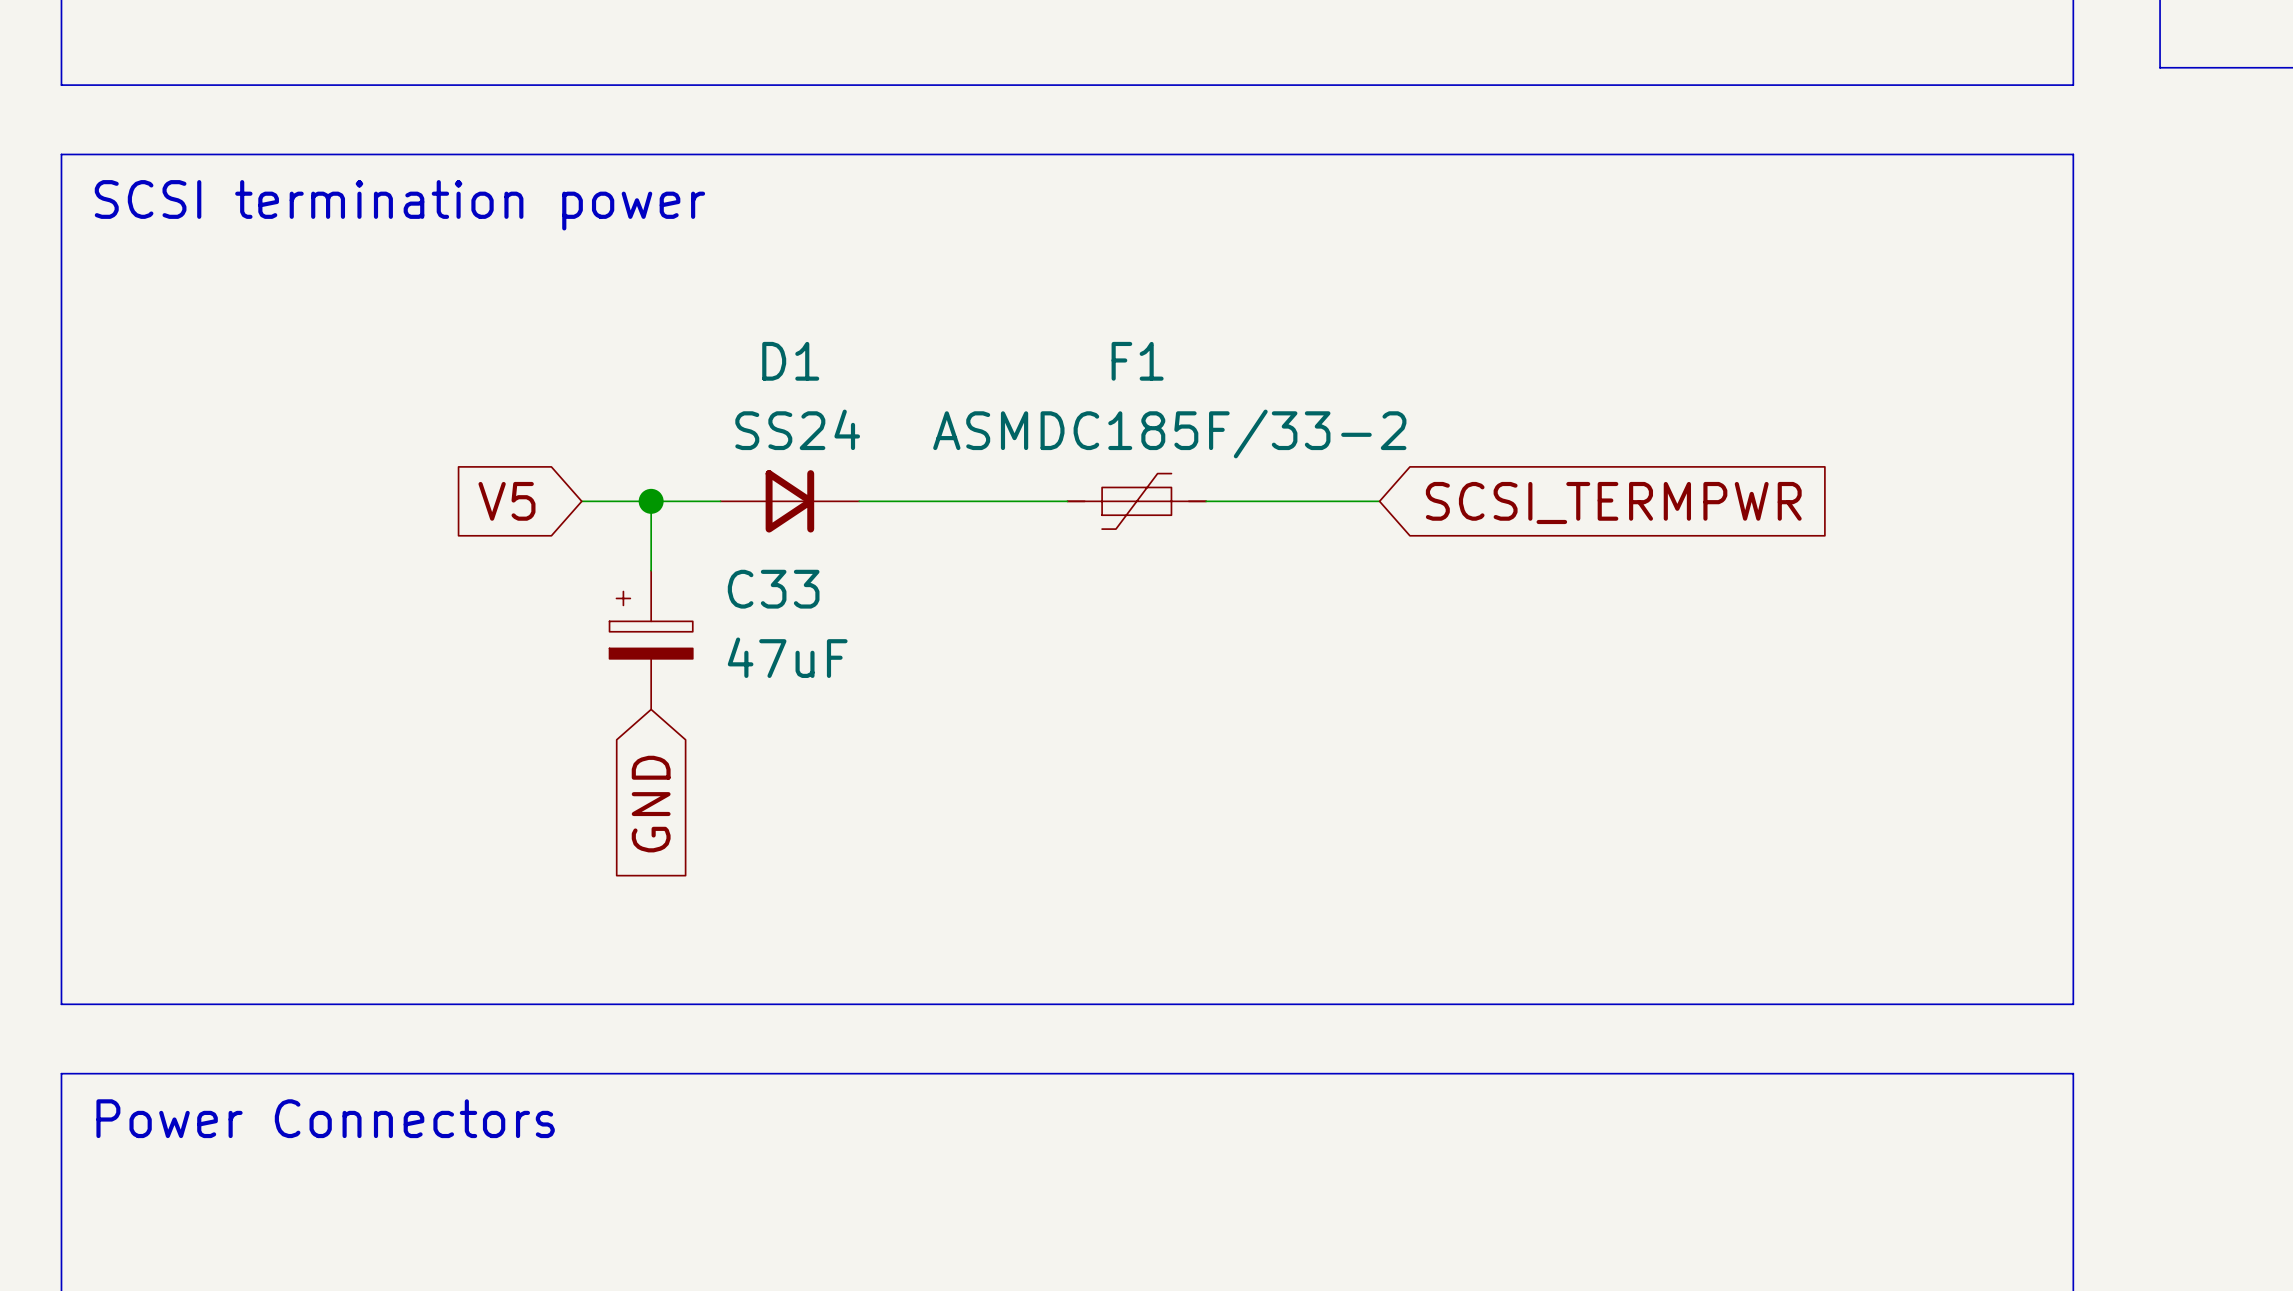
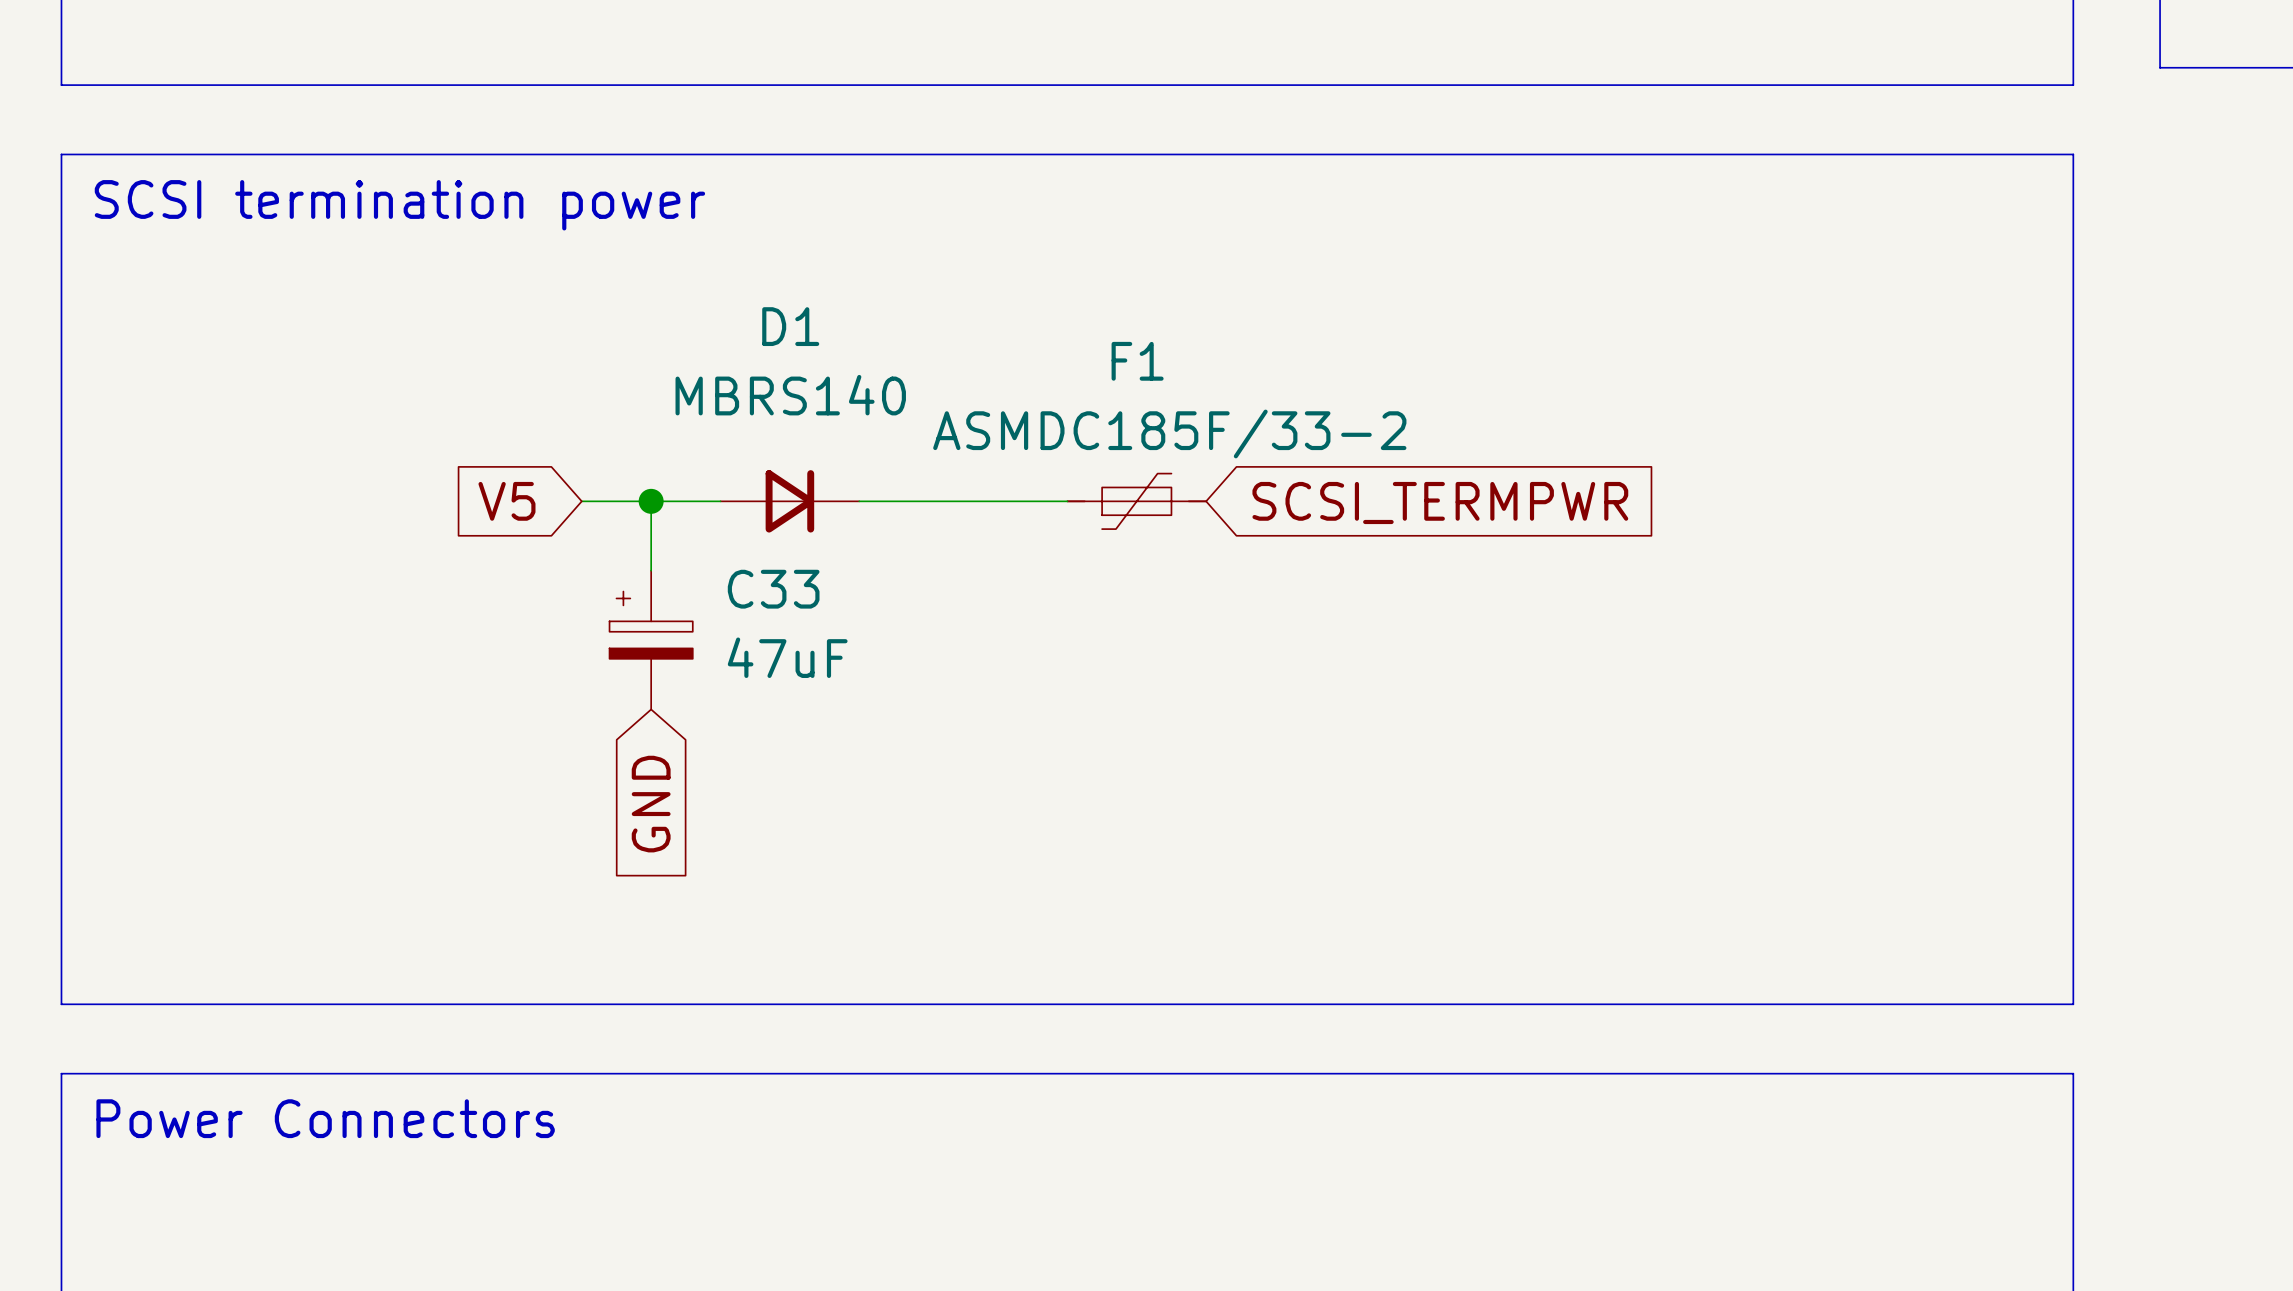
D1 name position: D1 (790, 361) -> D1 (790, 326)
D1 value: SS24 (797, 429) -> MBRS140 (790, 395)
wire: (1206, 501) (1379, 501) -> none
global label position: SCSI_TERMPWR (1613, 502) -> SCSI_TERMPWR (1440, 502)

